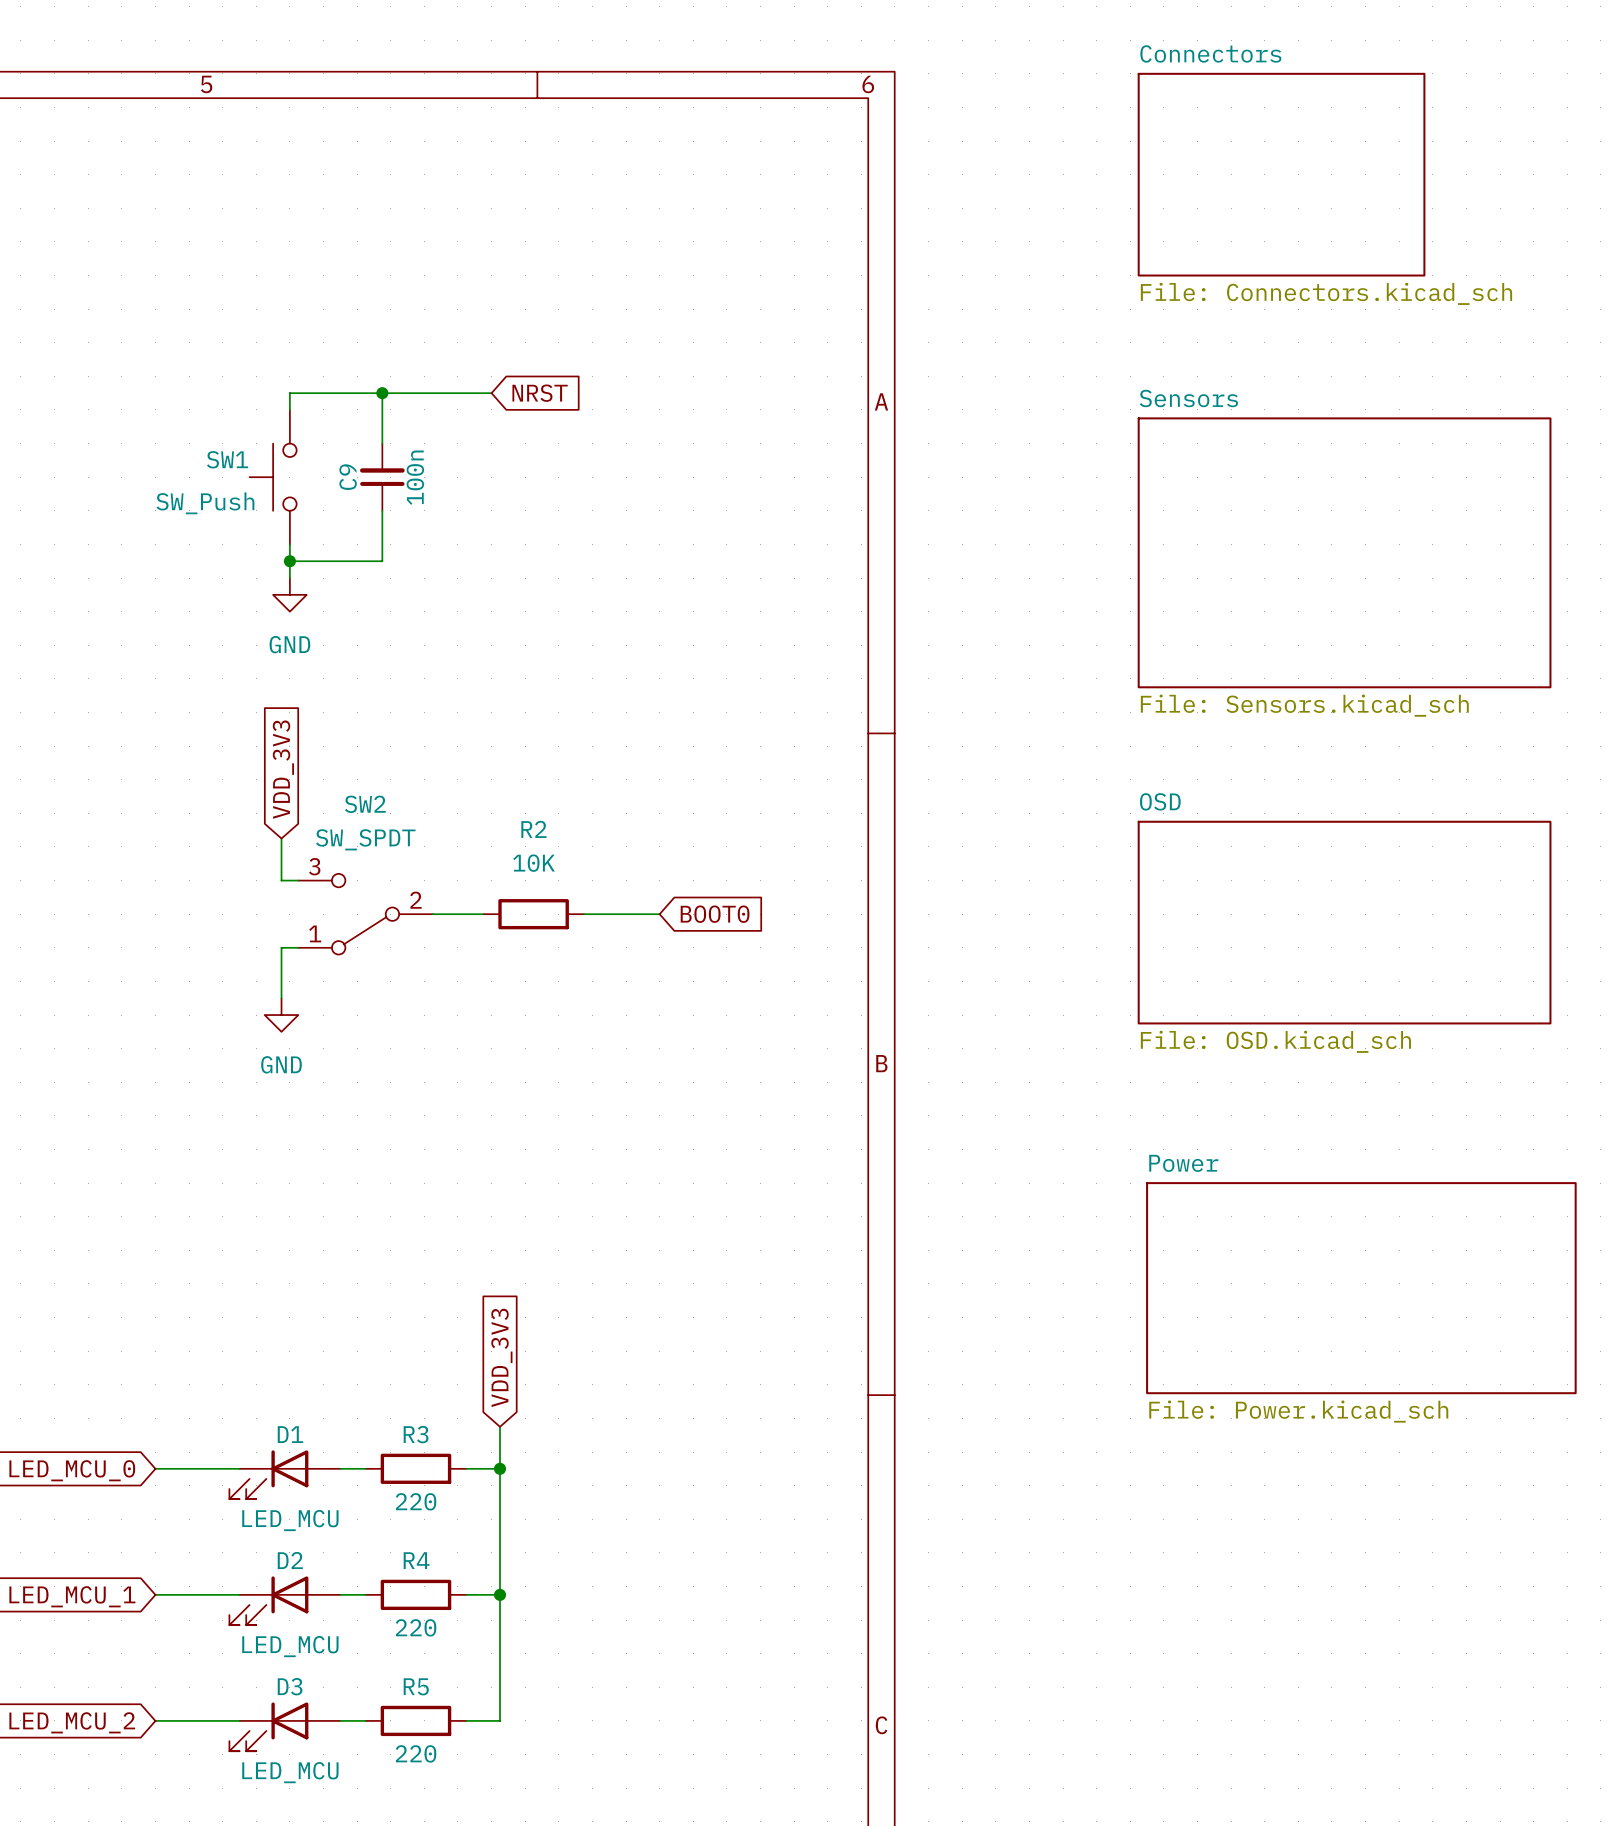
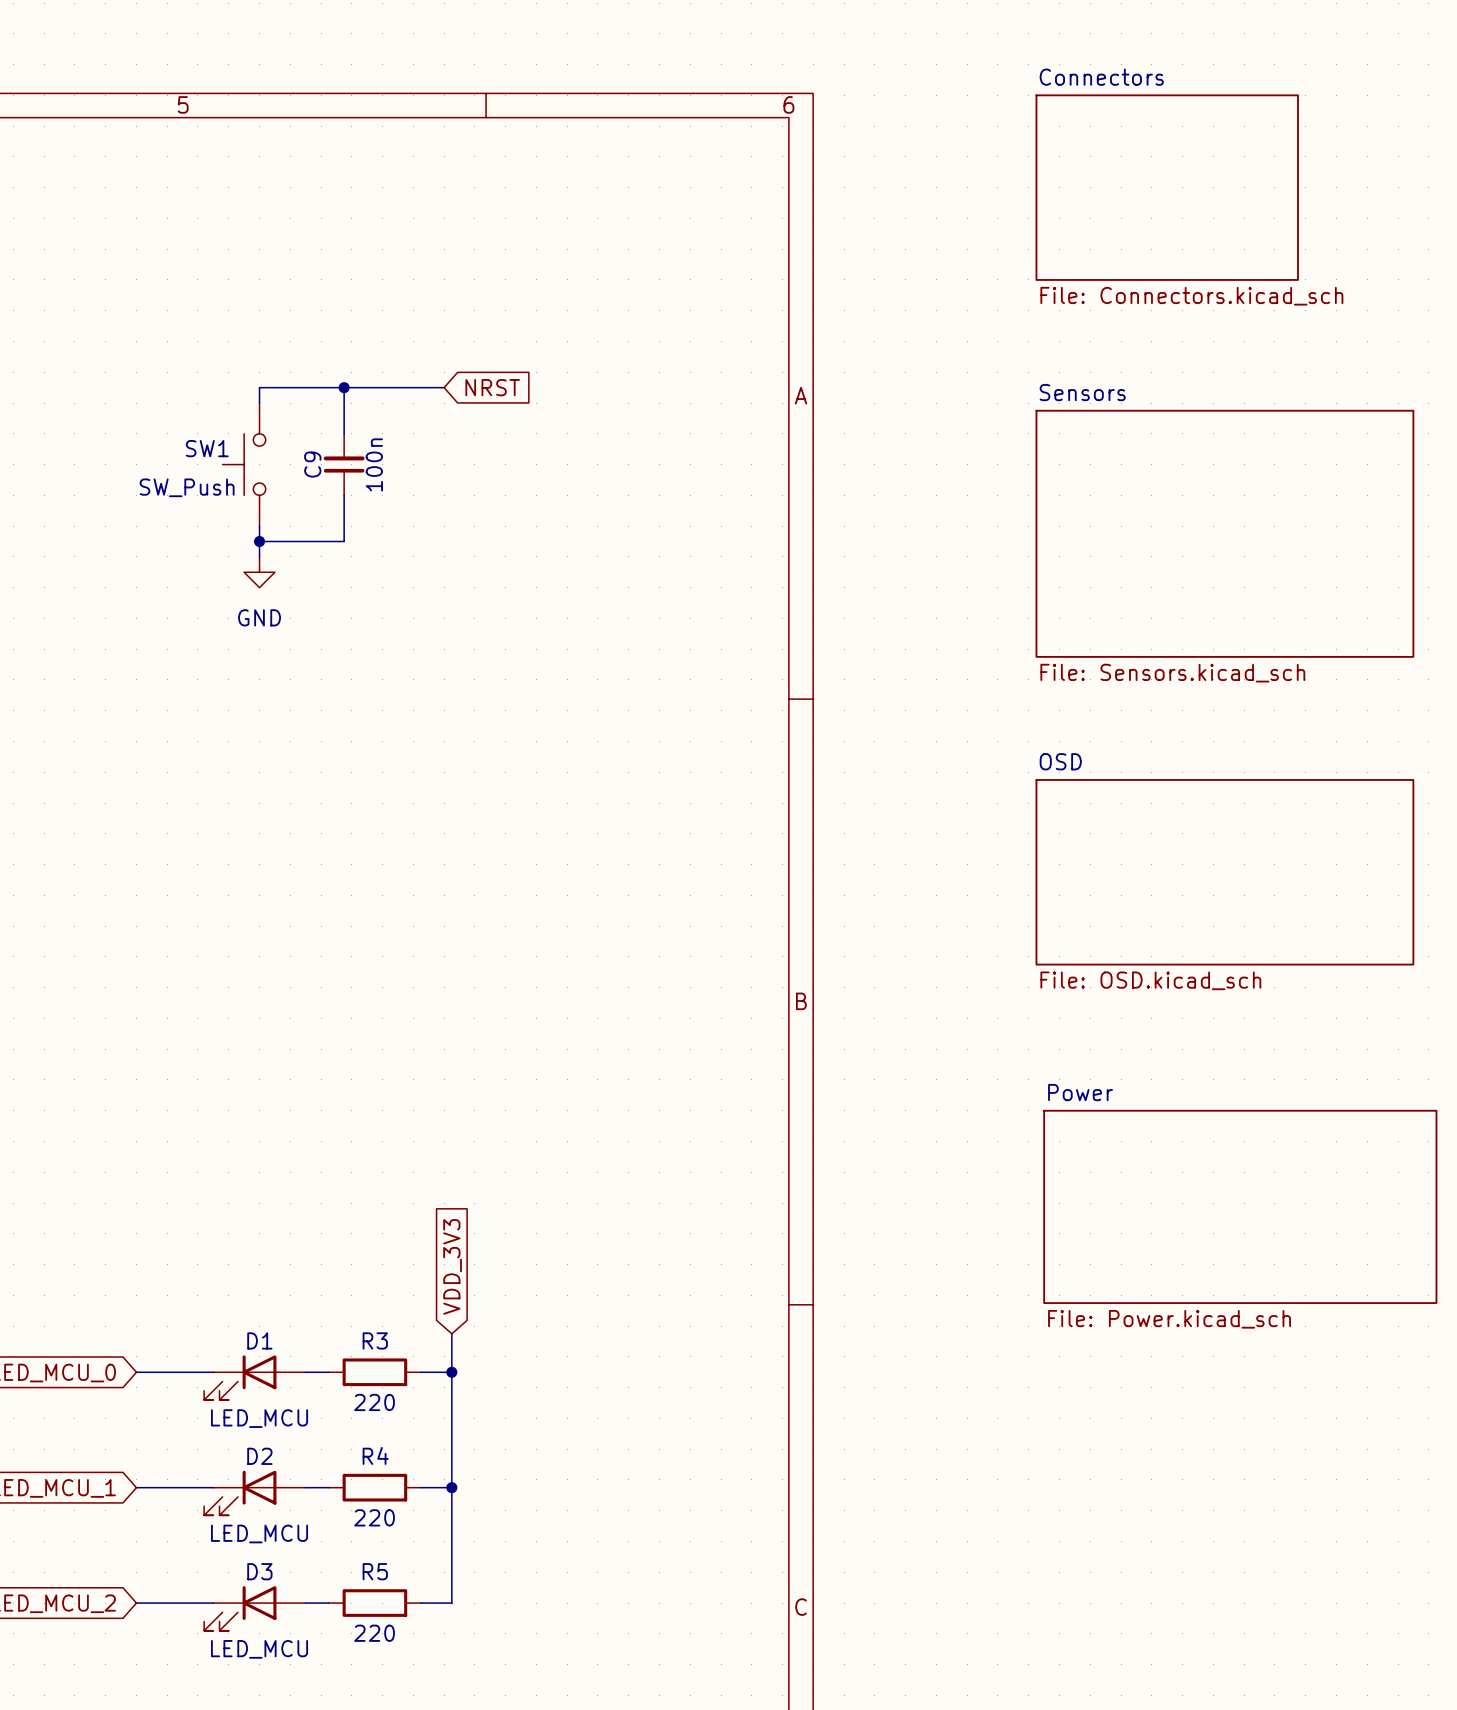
global label: VDD_3V3 (283, 769) -> none
wire: (281, 838) (281, 880) (298, 880) -> none
SW2: SW_SPDT (365, 914) -> none
wire: (432, 914) (483, 914) -> none
R2: 10K (533, 914) -> none
wire: (584, 914) (659, 914) -> none
global label: BOOT0 (715, 914) -> none
wire: (298, 947) (281, 947) (281, 998) -> none
power symbol: GND (281, 1015) -> none

